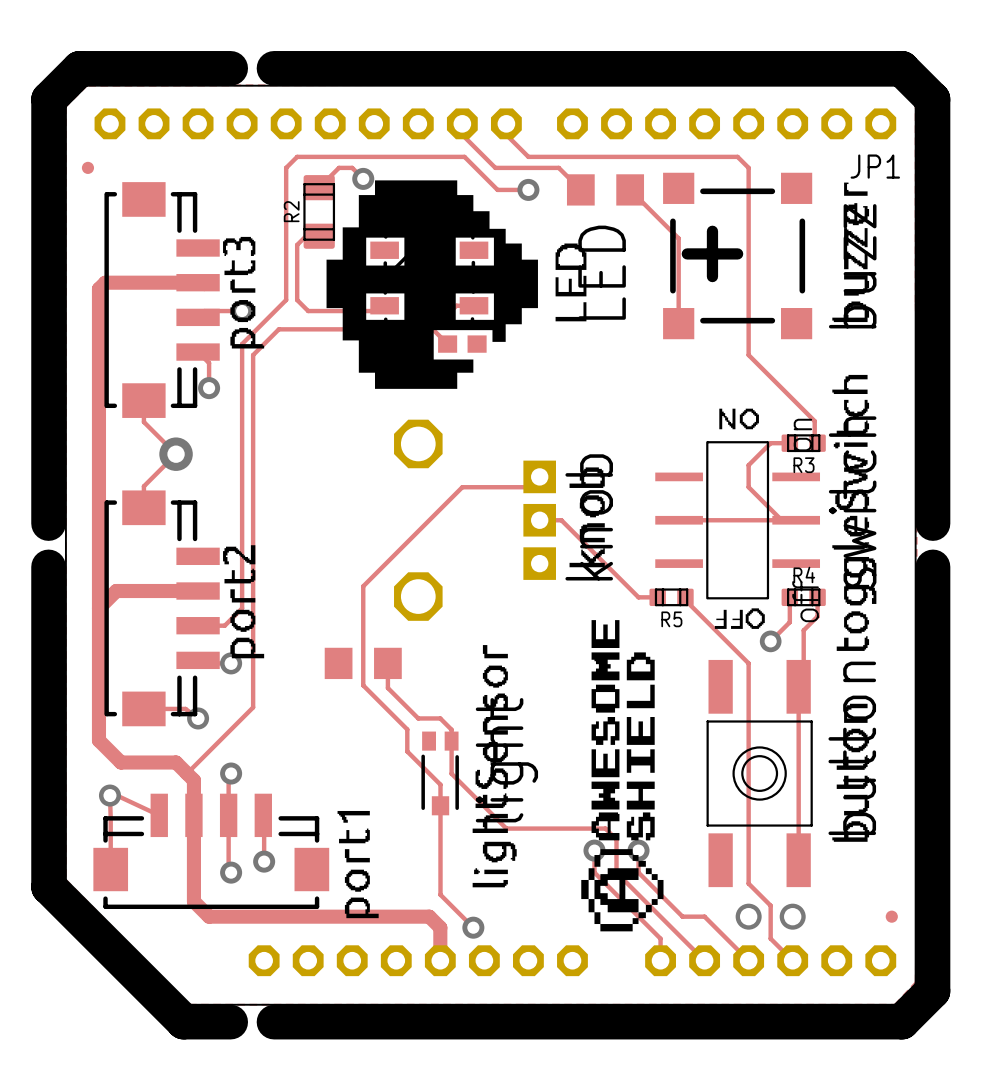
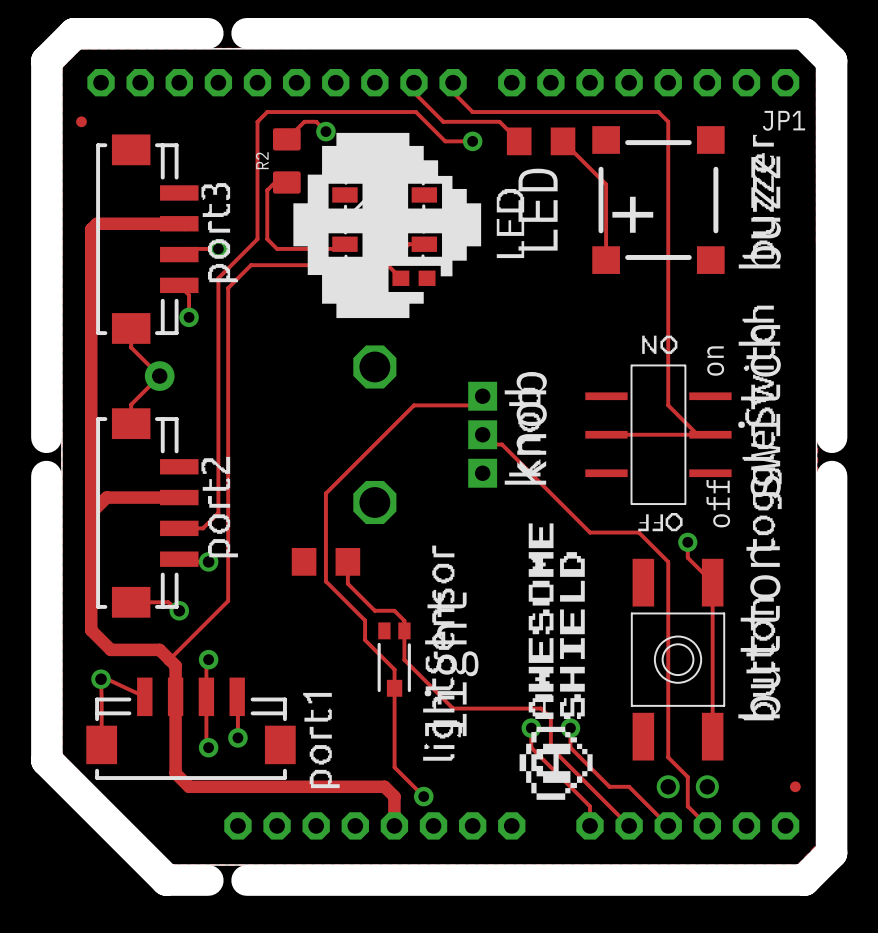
R2 footprint: [303, 175, 336, 249] -> [272, 128, 301, 194]
track: (748, 355) (814, 421) (814, 440) (817, 443) -> (668, 288) (668, 385)
track: (789, 443) (770, 443) (748, 465) -> none
R3: (803, 443) -> none
track: (539, 520) (561, 520) (638, 597) (657, 597) -> (482, 434) (492, 444) (501, 444) (590, 532) (638, 532)
R5: (671, 597) -> none
track: (685, 597) (685, 600) (715, 630) -> none
track: (789, 597) (789, 622) (770, 641) -> none
R4: (803, 597) -> none
track: (817, 597) (817, 616) (803, 630) (803, 681) (798, 686) -> (687, 542) (687, 557) (712, 582)

